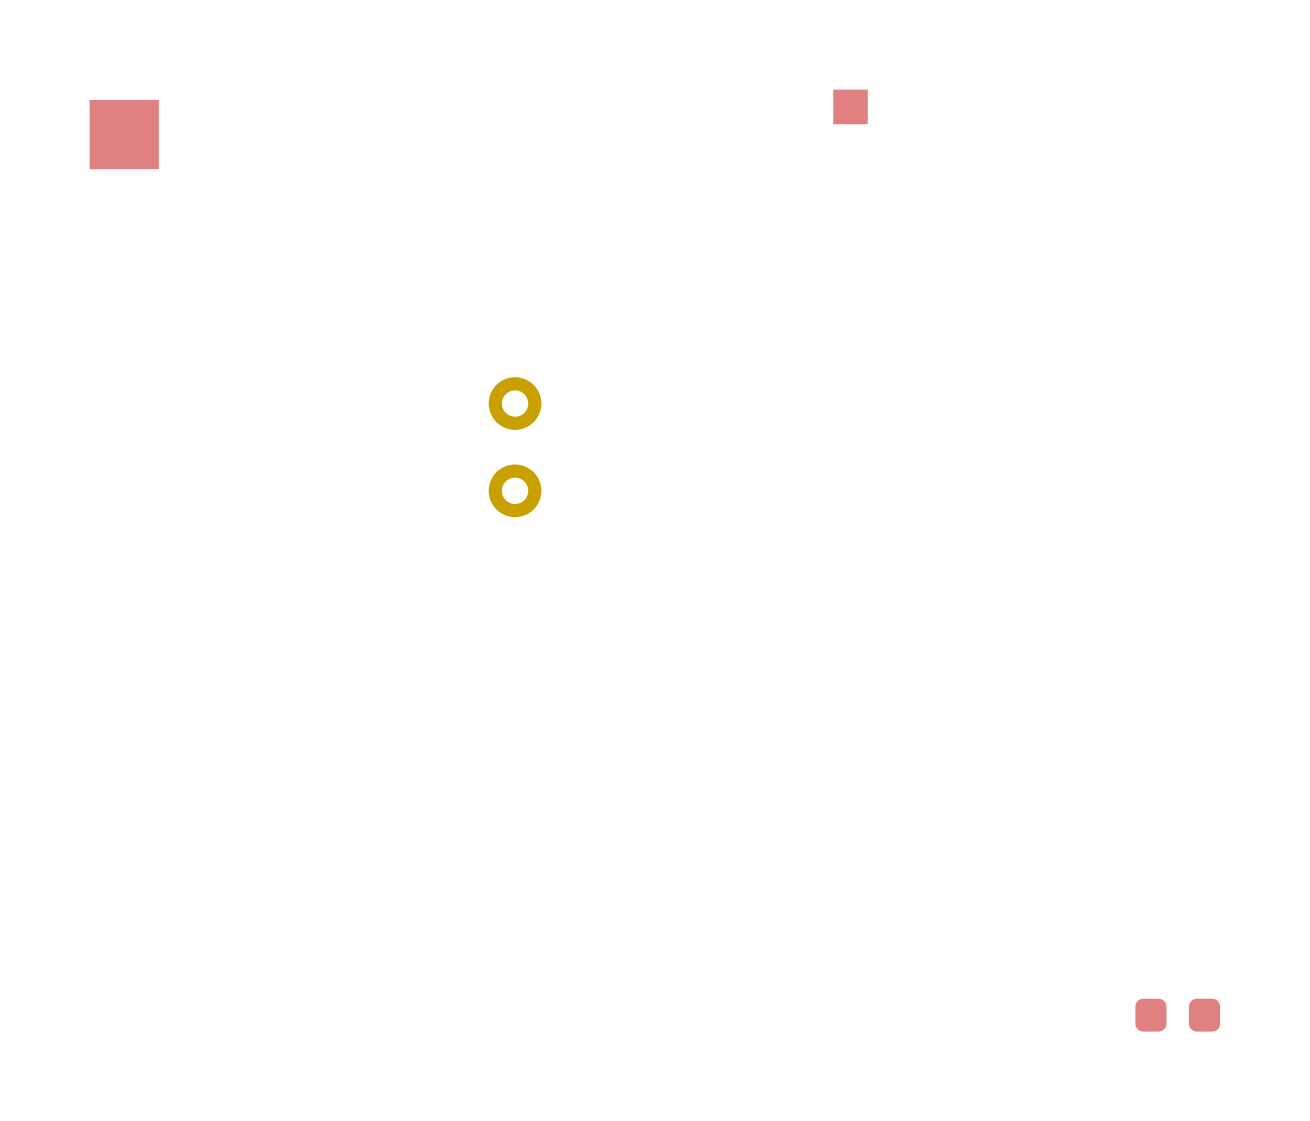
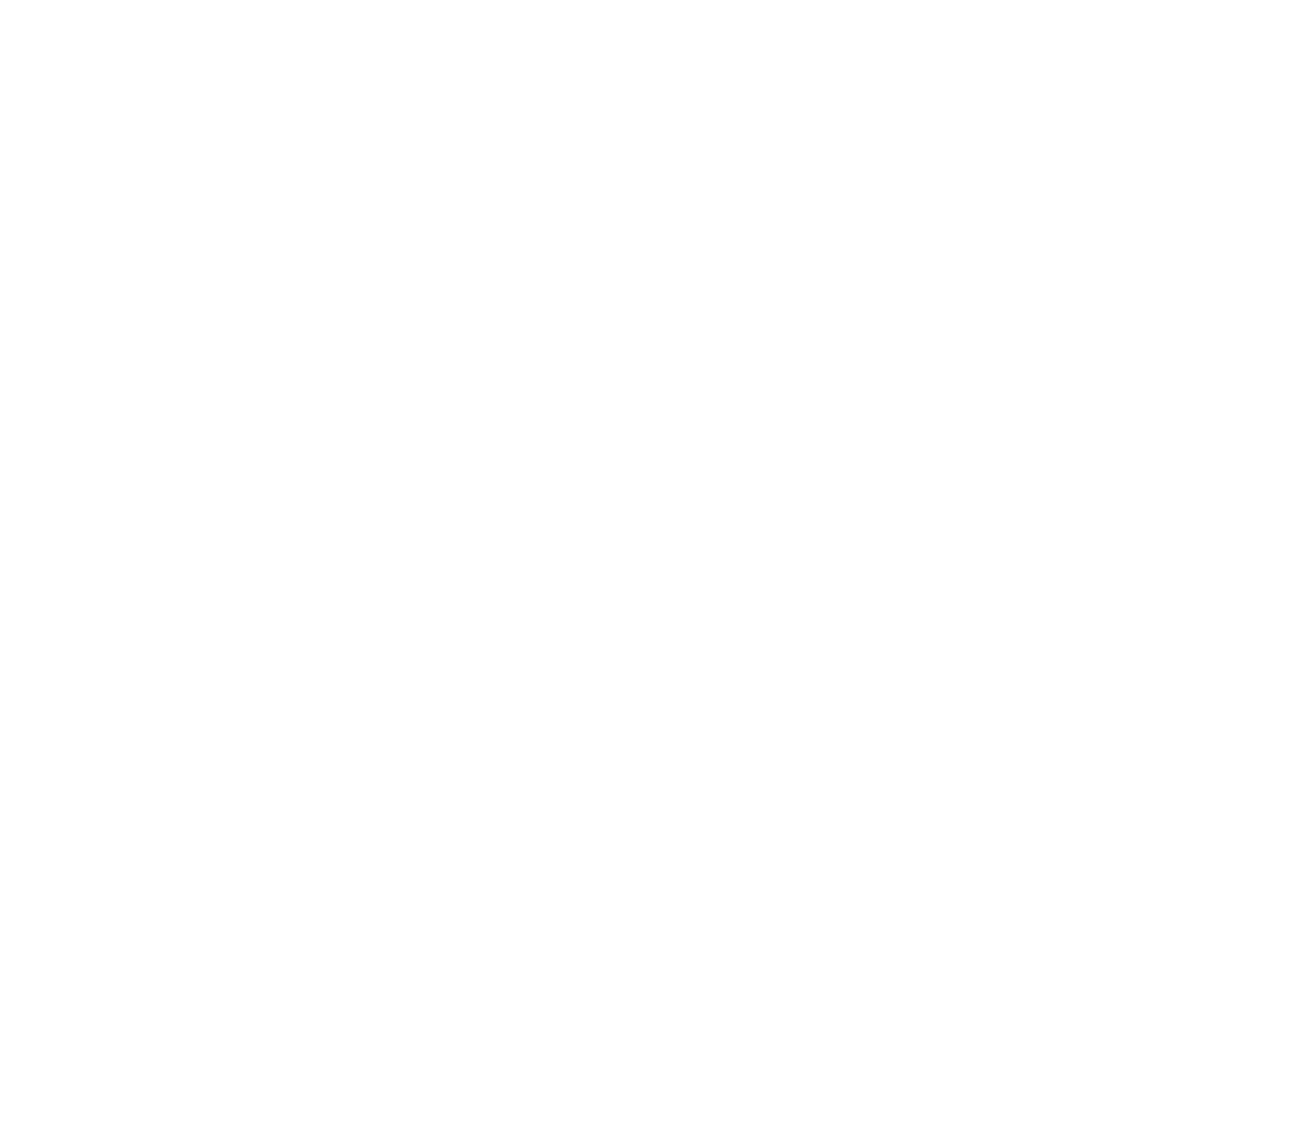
part: (850, 106) -> none
part: (124, 134) -> none
part: (515, 403) -> none
part: (515, 490) -> none
part: (1177, 1015) -> none

